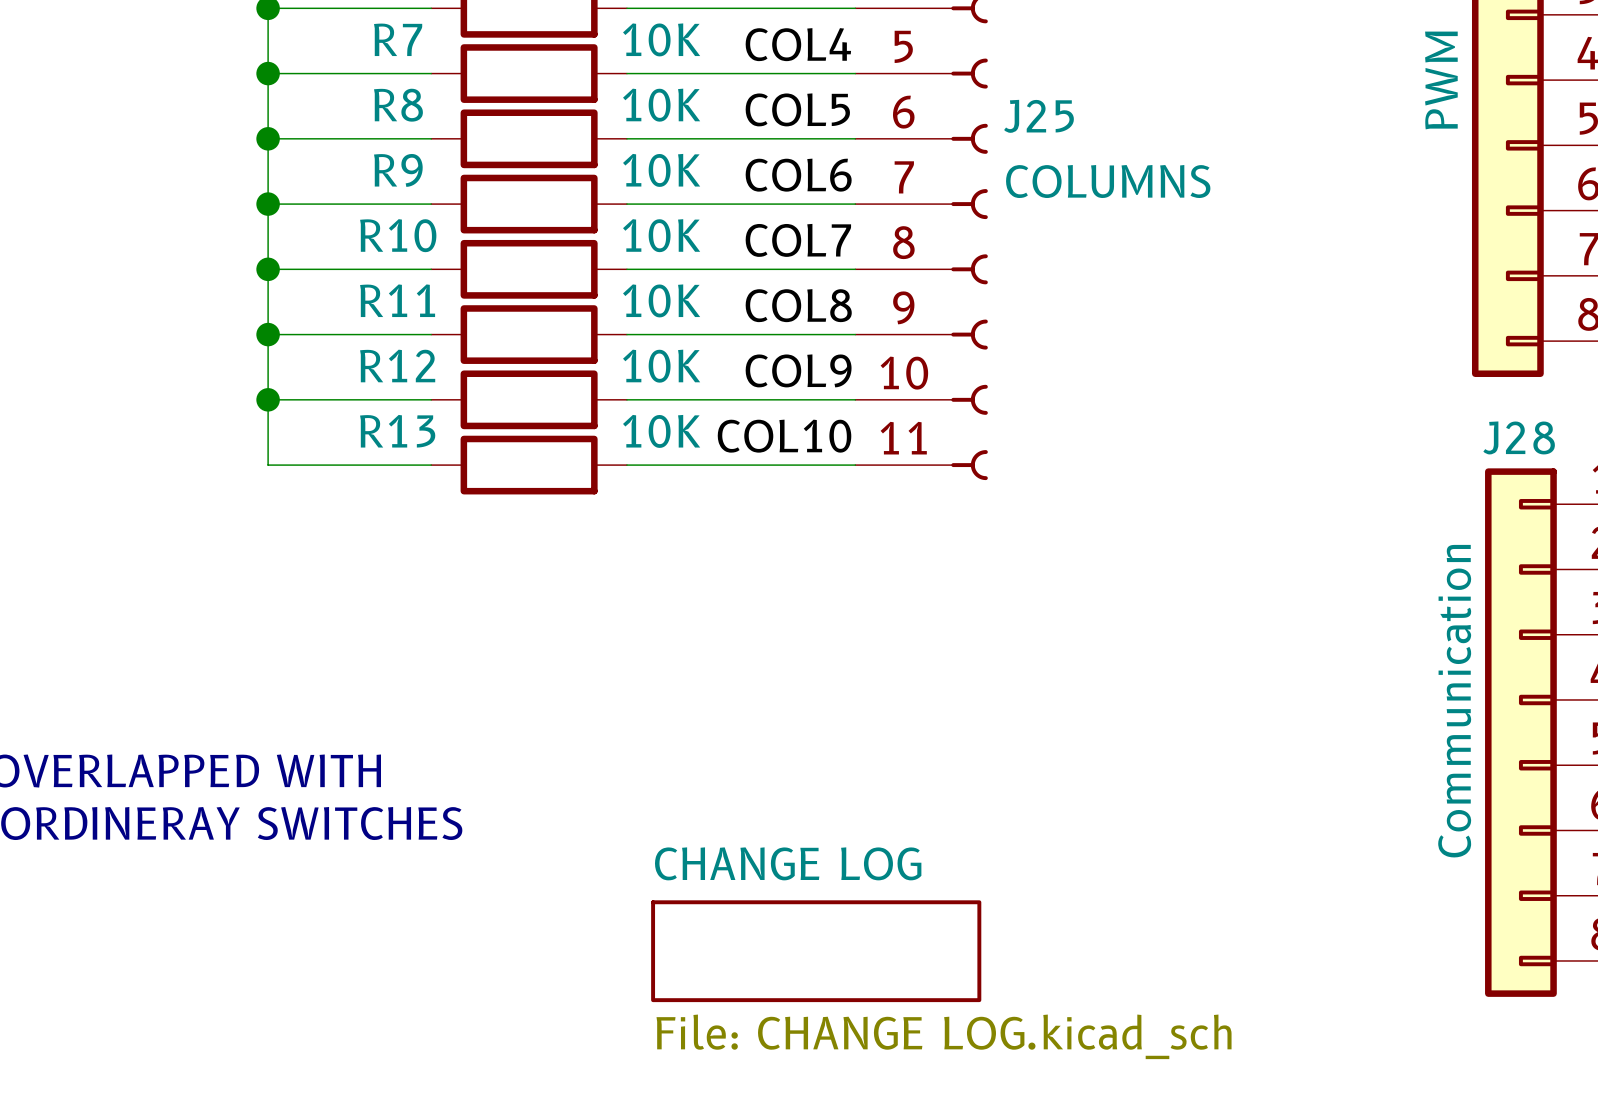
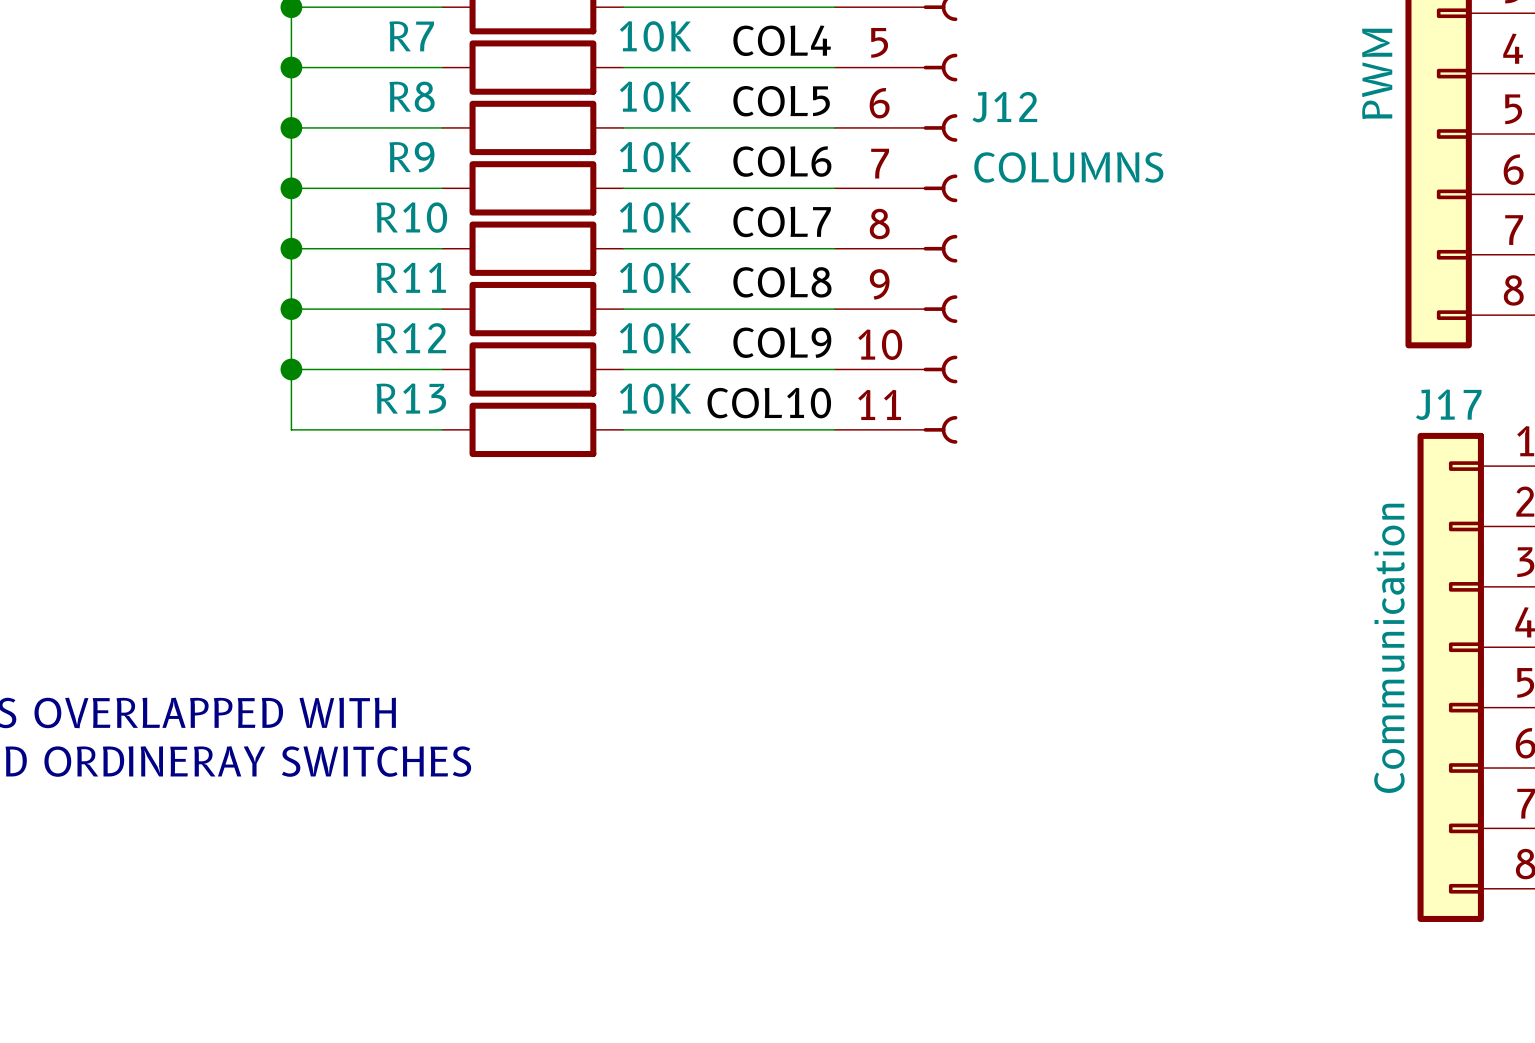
J25 name: J25 (1039, 116) -> J12 (1004, 107)
J28 name: J28 (1519, 437) -> J17 (1448, 404)
sheet CHANGE LOG: File: CHANGE LOG.kicad_sch (816, 951) -> none

